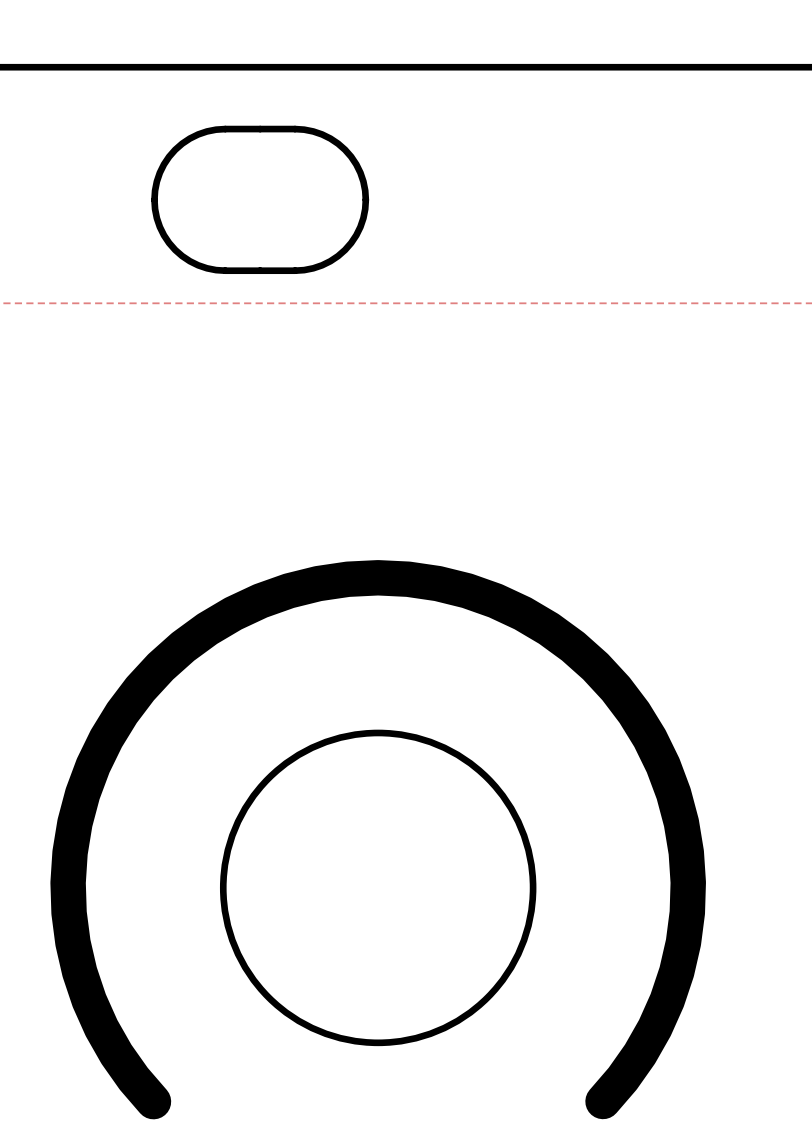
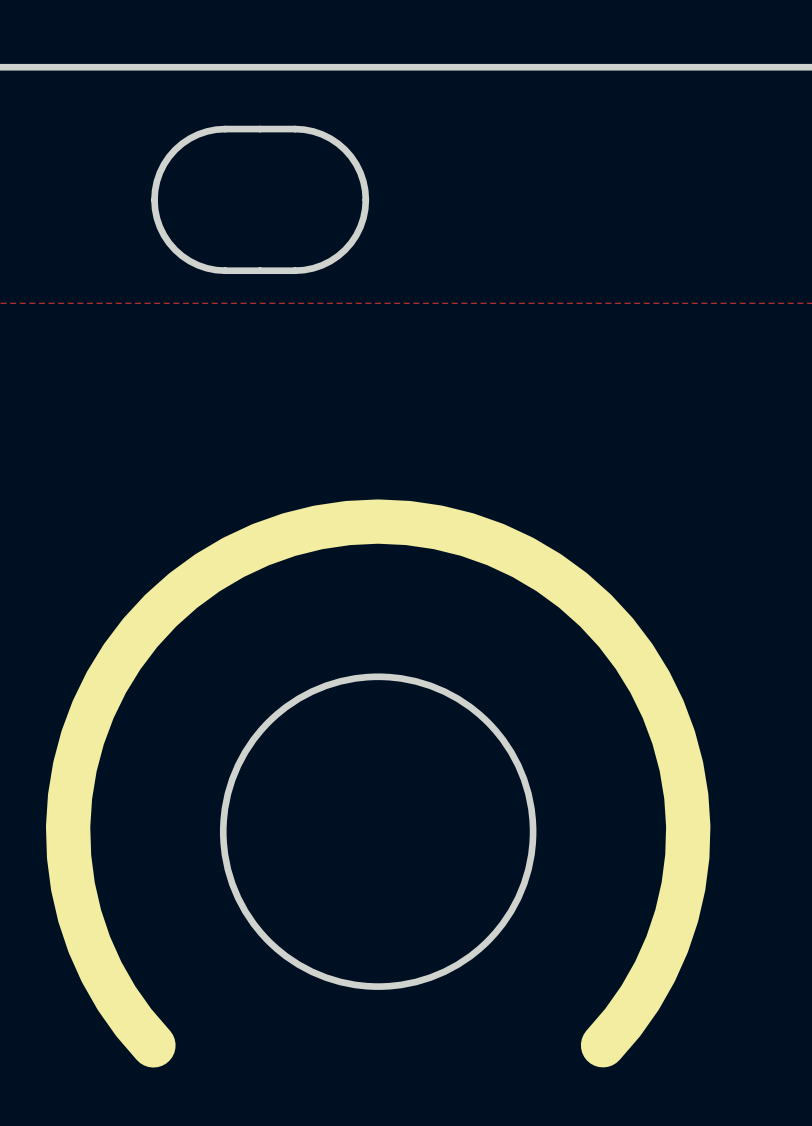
round board edge position: (378, 887) -> (378, 831)
line: (153, 1101) (133, 1078) (101, 1028) (79, 972) (72, 942) (69, 912) (70, 852) (82, 793) (93, 765) (122, 712) (140, 688) (183, 646) (207, 629) (233, 613) (289, 590) (318, 583) (378, 577) (408, 579) (467, 590) (495, 600) (548, 628) (595, 666) (615, 688) (634, 712) (663, 765) (673, 793) (686, 852) (688, 882) (683, 942) (667, 1000) (654, 1027) (622, 1078) (603, 1101) -> (153, 1045) (133, 1022) (101, 971) (79, 915) (72, 886) (69, 856) (70, 796) (82, 737) (93, 709) (122, 656) (140, 632) (183, 590) (207, 572) (233, 557) (289, 534) (348, 523) (378, 521) (408, 523) (467, 534) (495, 544) (548, 572) (595, 610) (615, 632) (634, 656) (663, 709) (673, 737) (686, 796) (688, 826) (683, 886) (667, 944) (654, 971) (622, 1022) (603, 1045)

